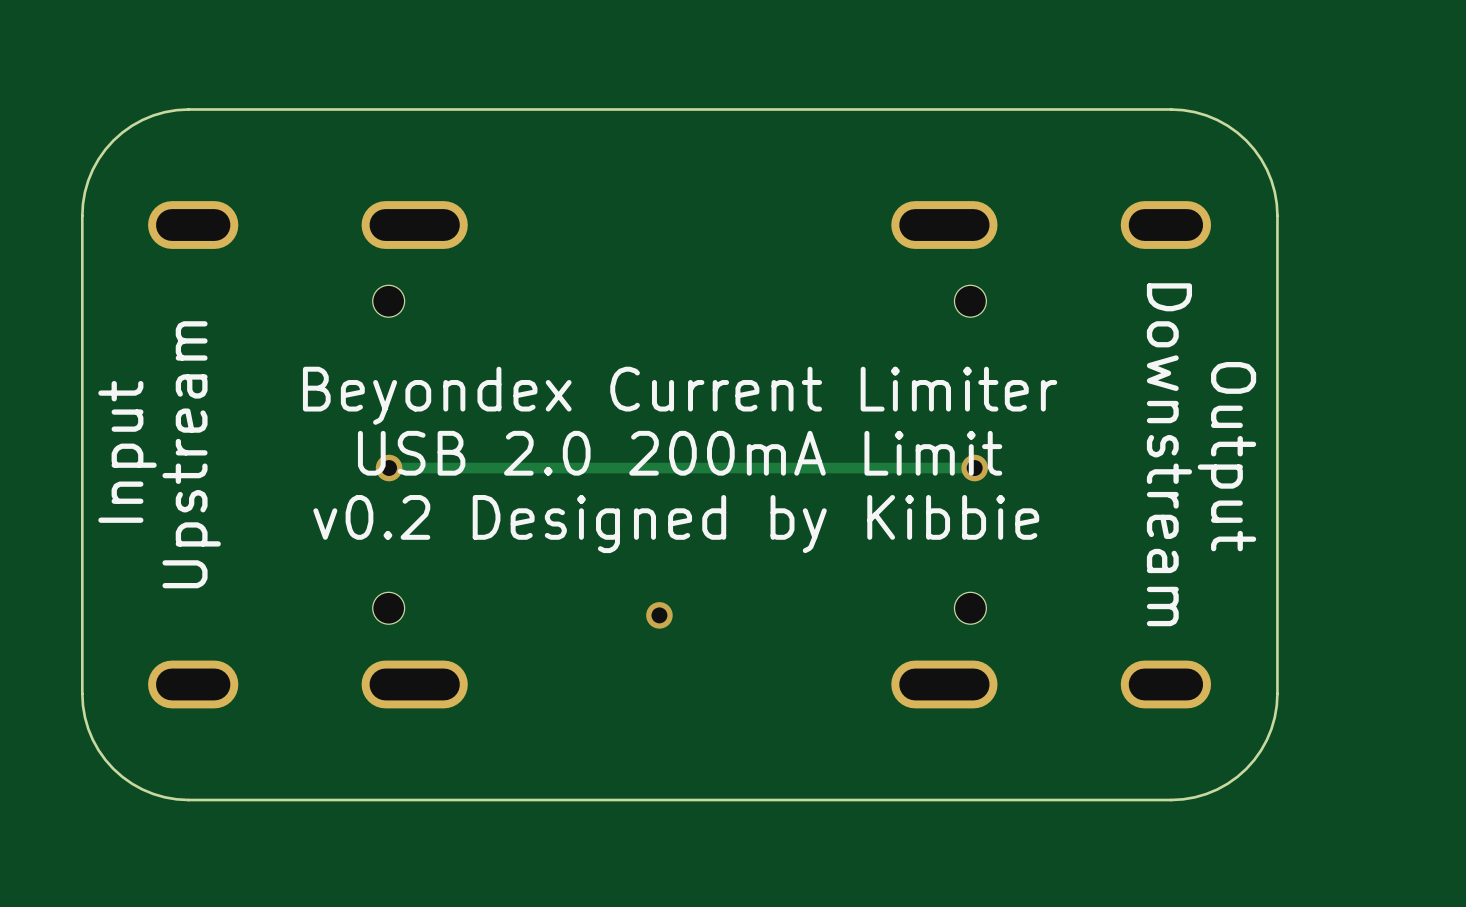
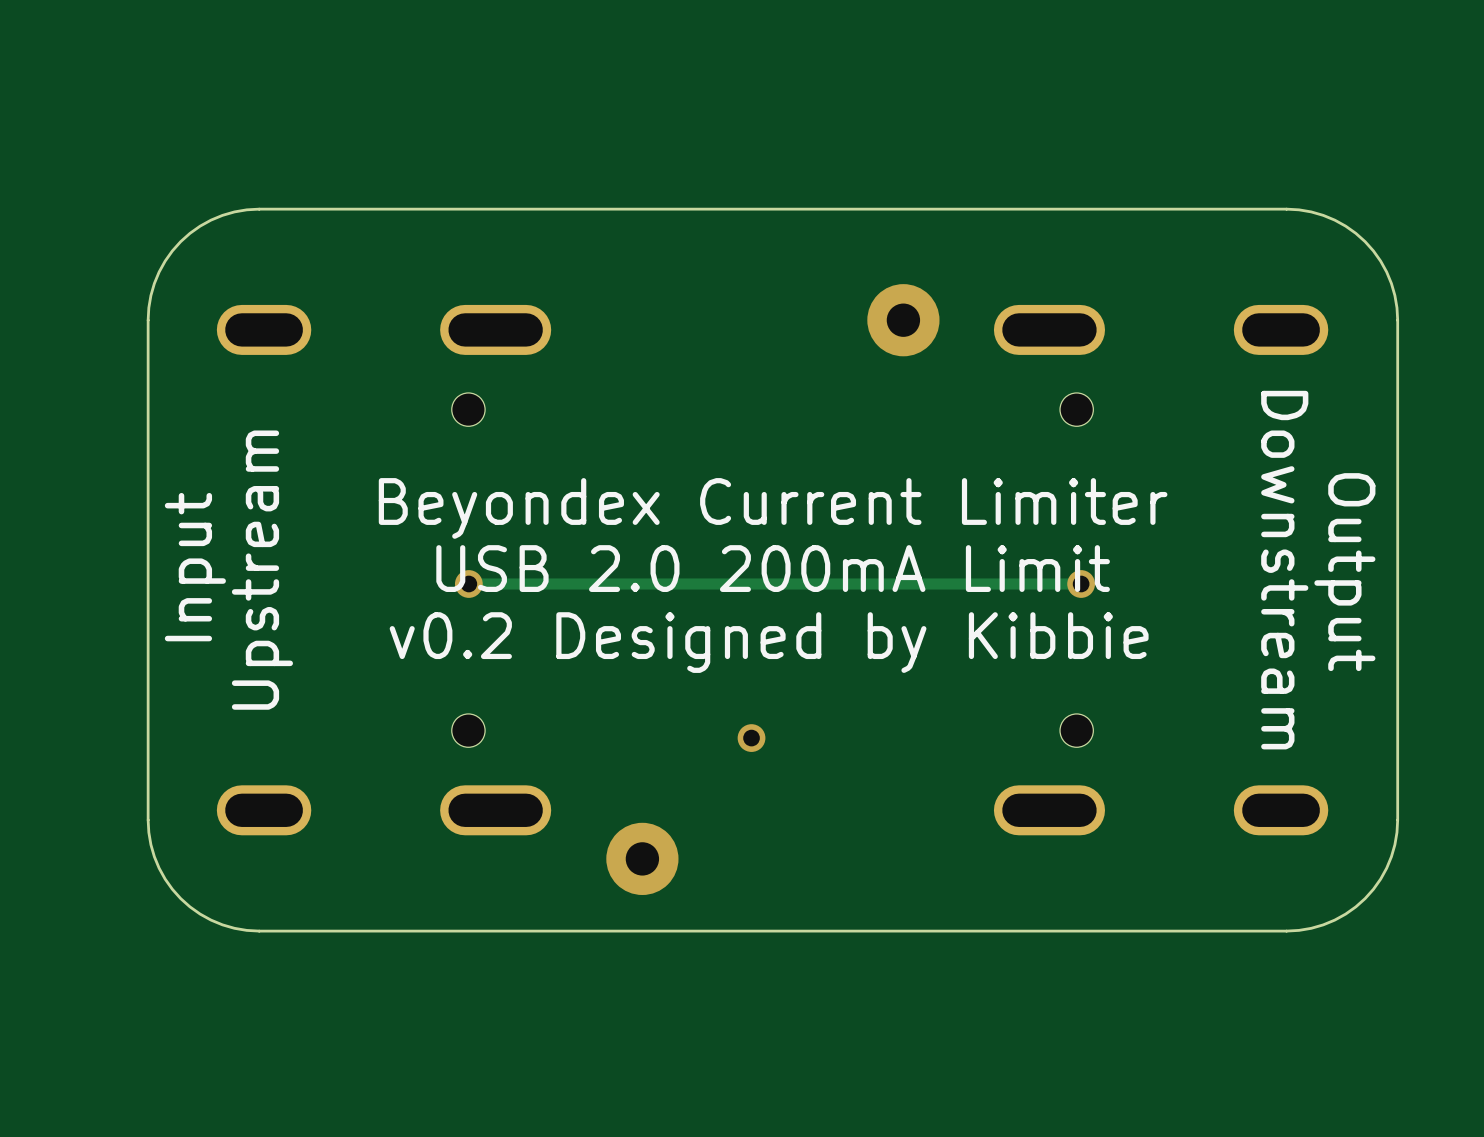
via: none -> (903, 320)
via: none -> (642, 858)

